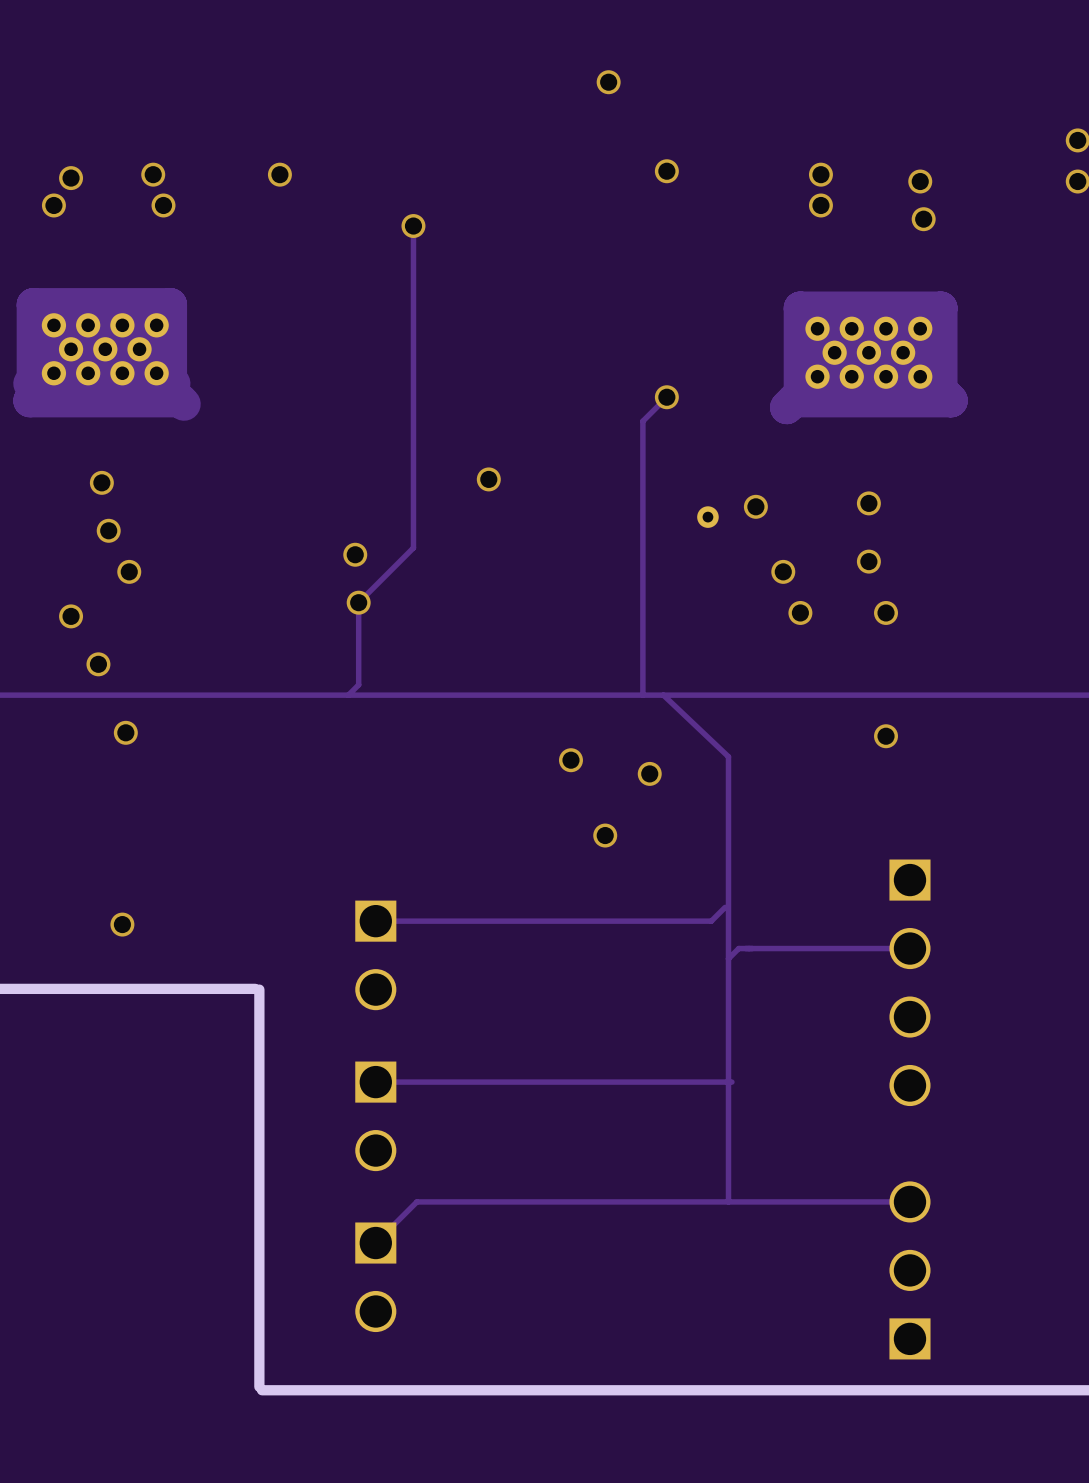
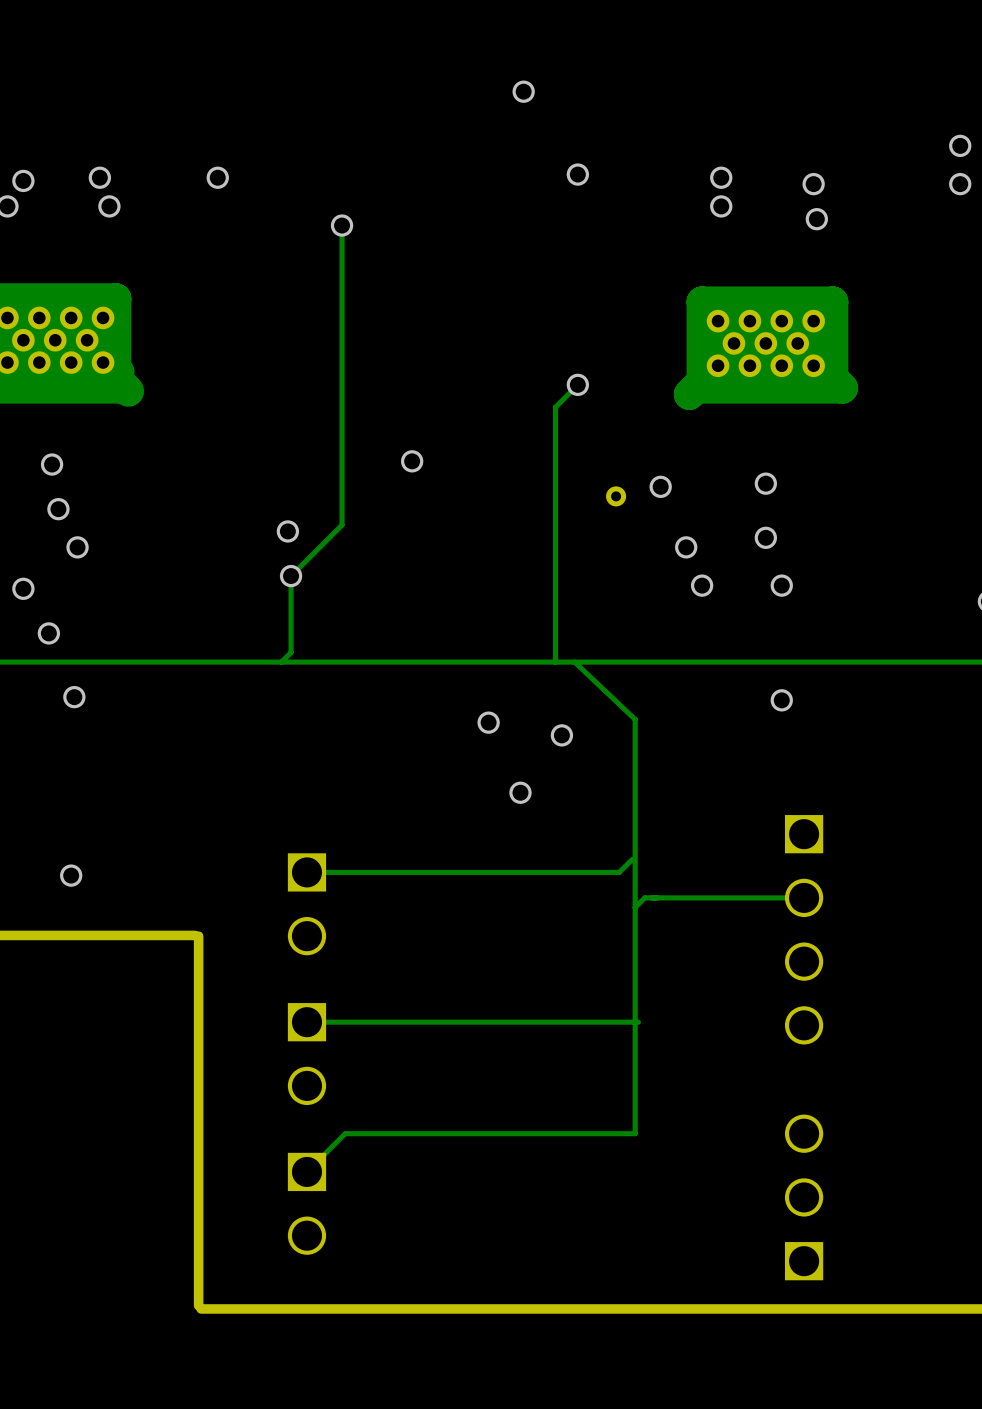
track: (909, 1201) (728, 1201) -> none

